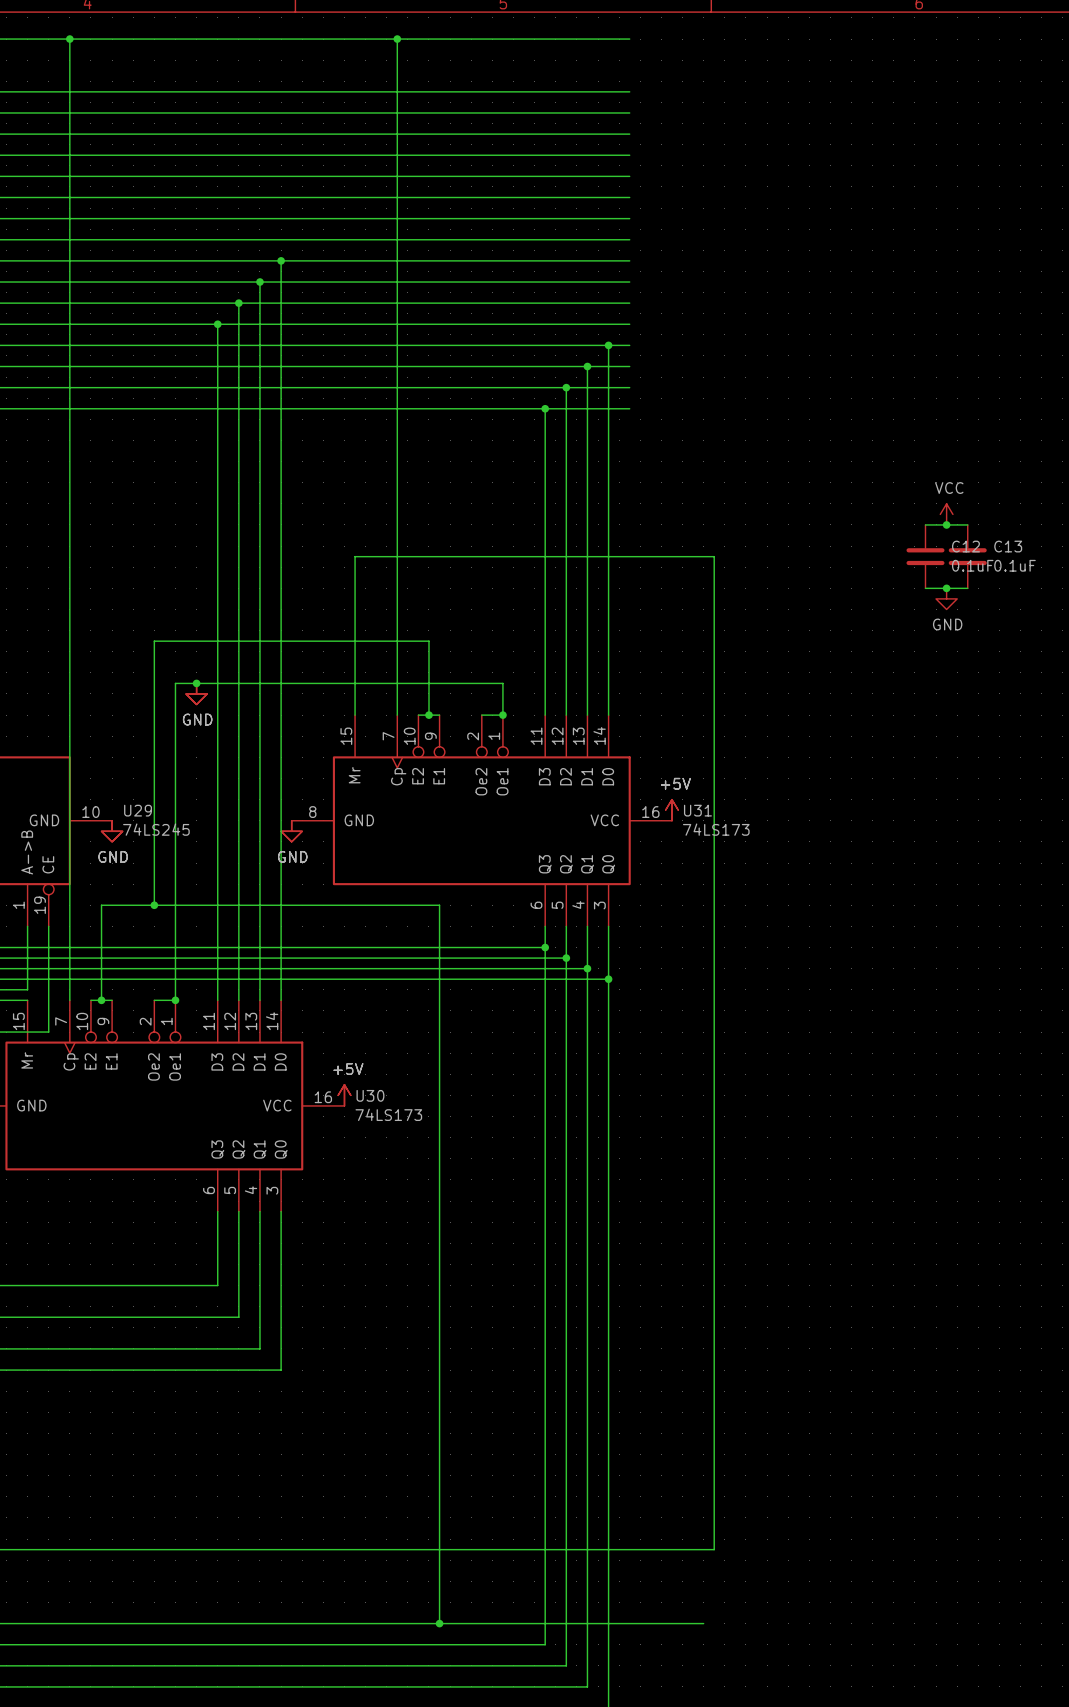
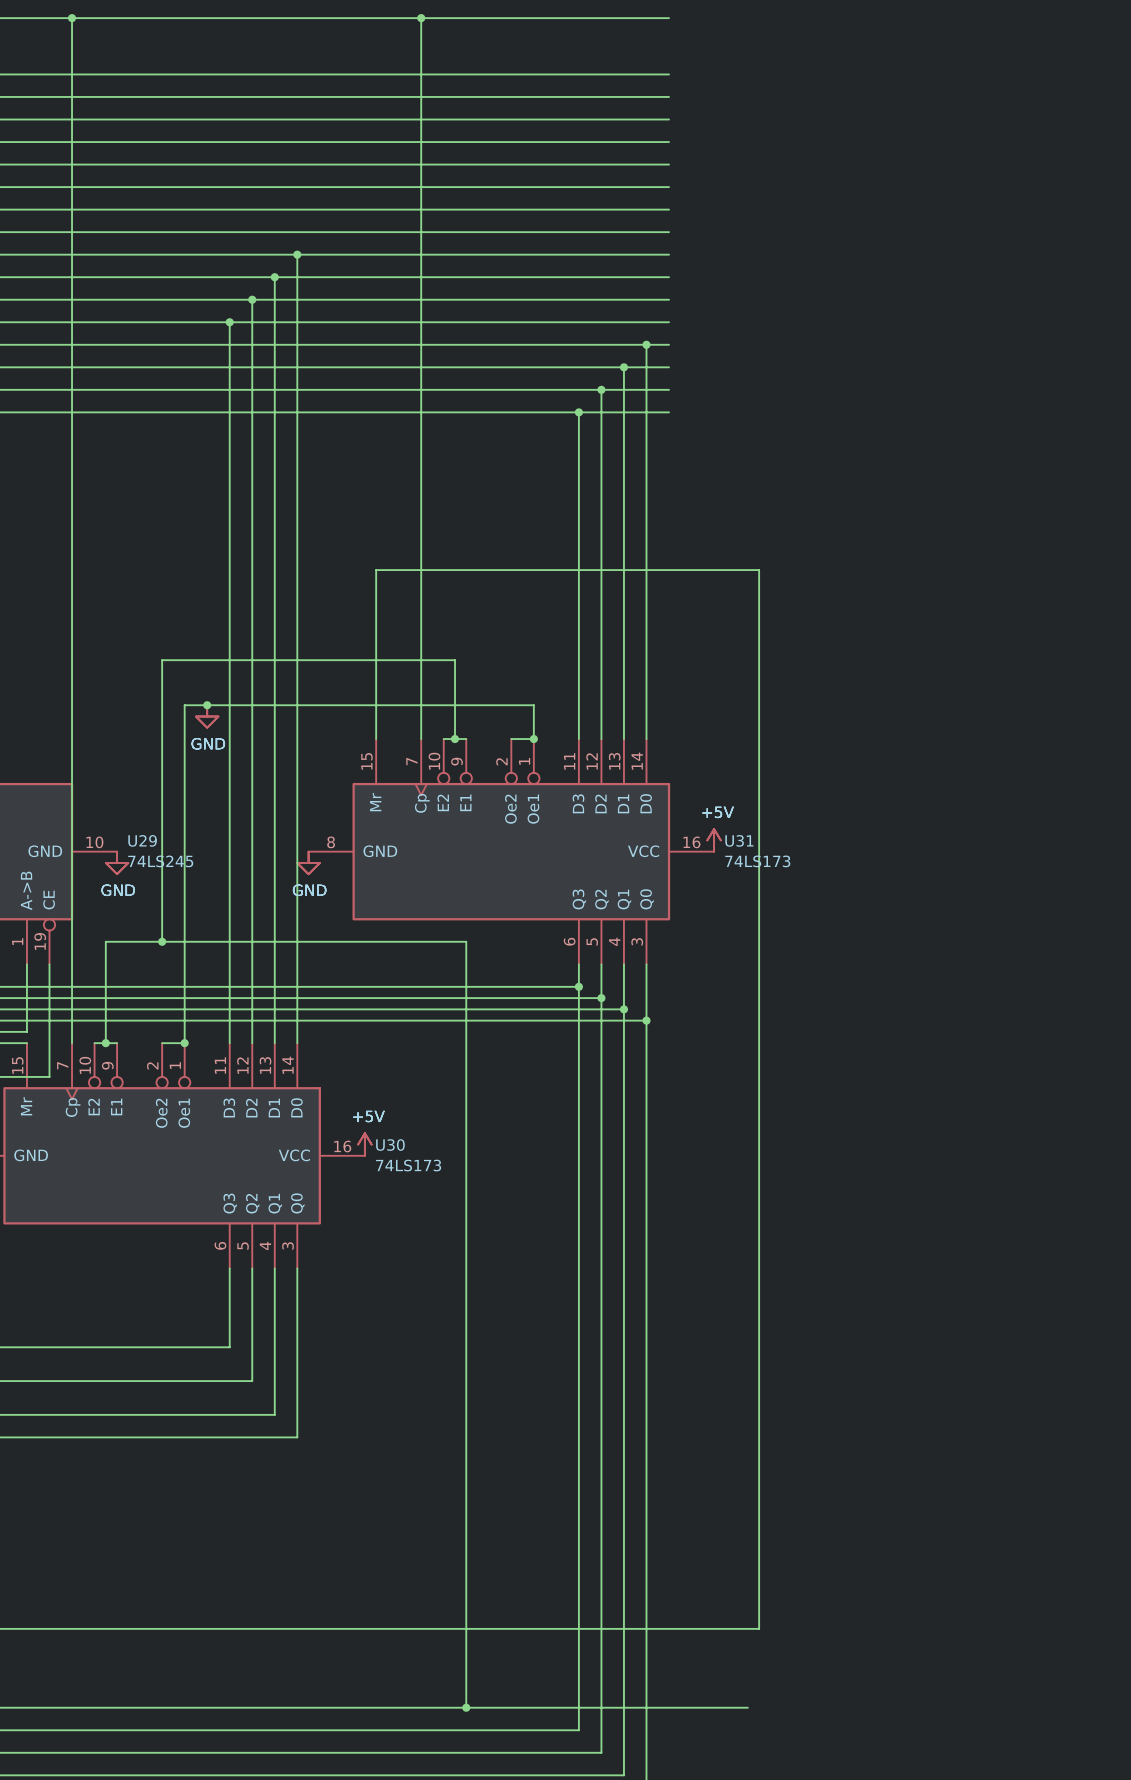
power symbol: VCC (946, 514) -> none
wire: (925, 524) (967, 524) -> none
junction: (946, 524) -> none
C12: 0.1uF (925, 556) -> none
C13: 0.1uF (967, 556) -> none
wire: (925, 588) (967, 588) -> none
junction: (946, 588) -> none
power symbol: GND (946, 598) -> none

